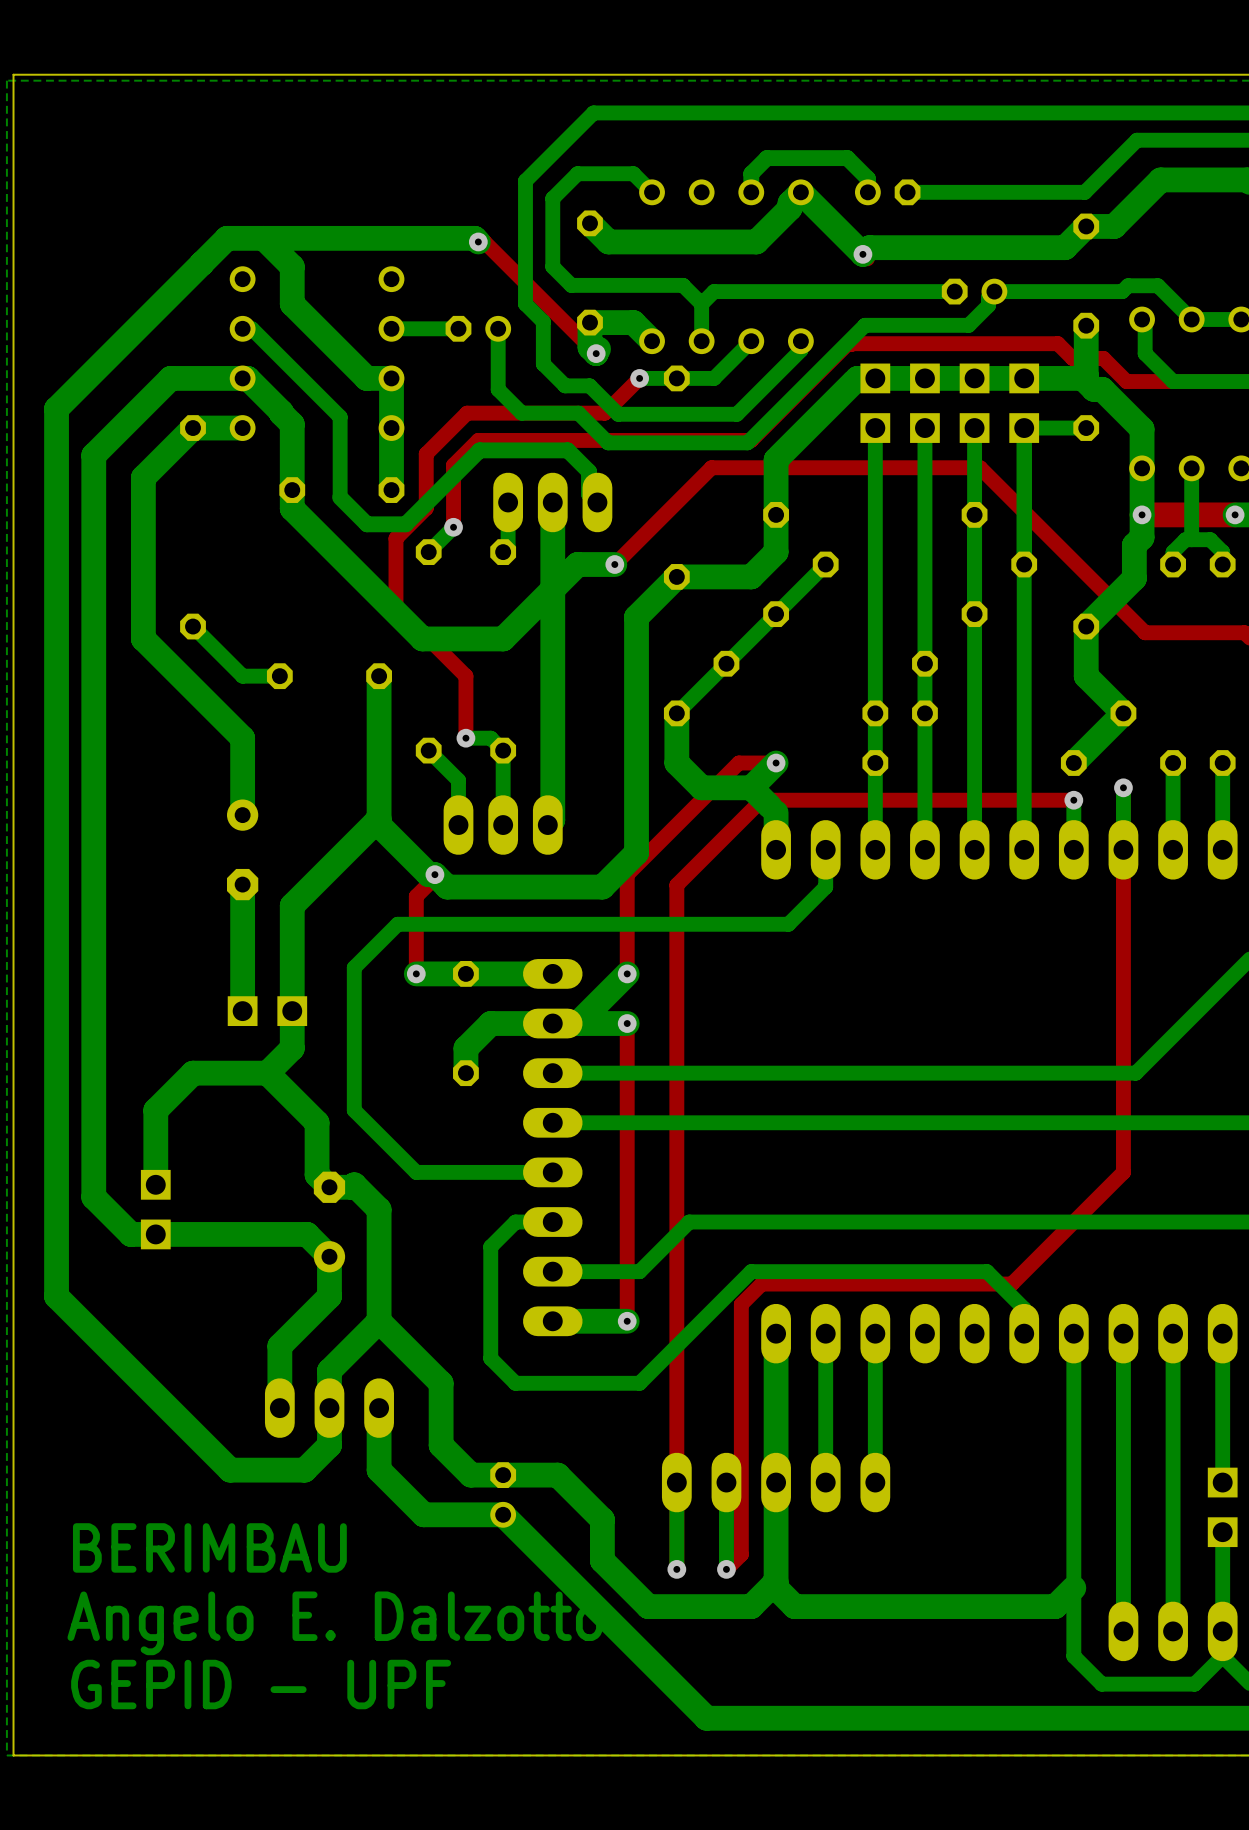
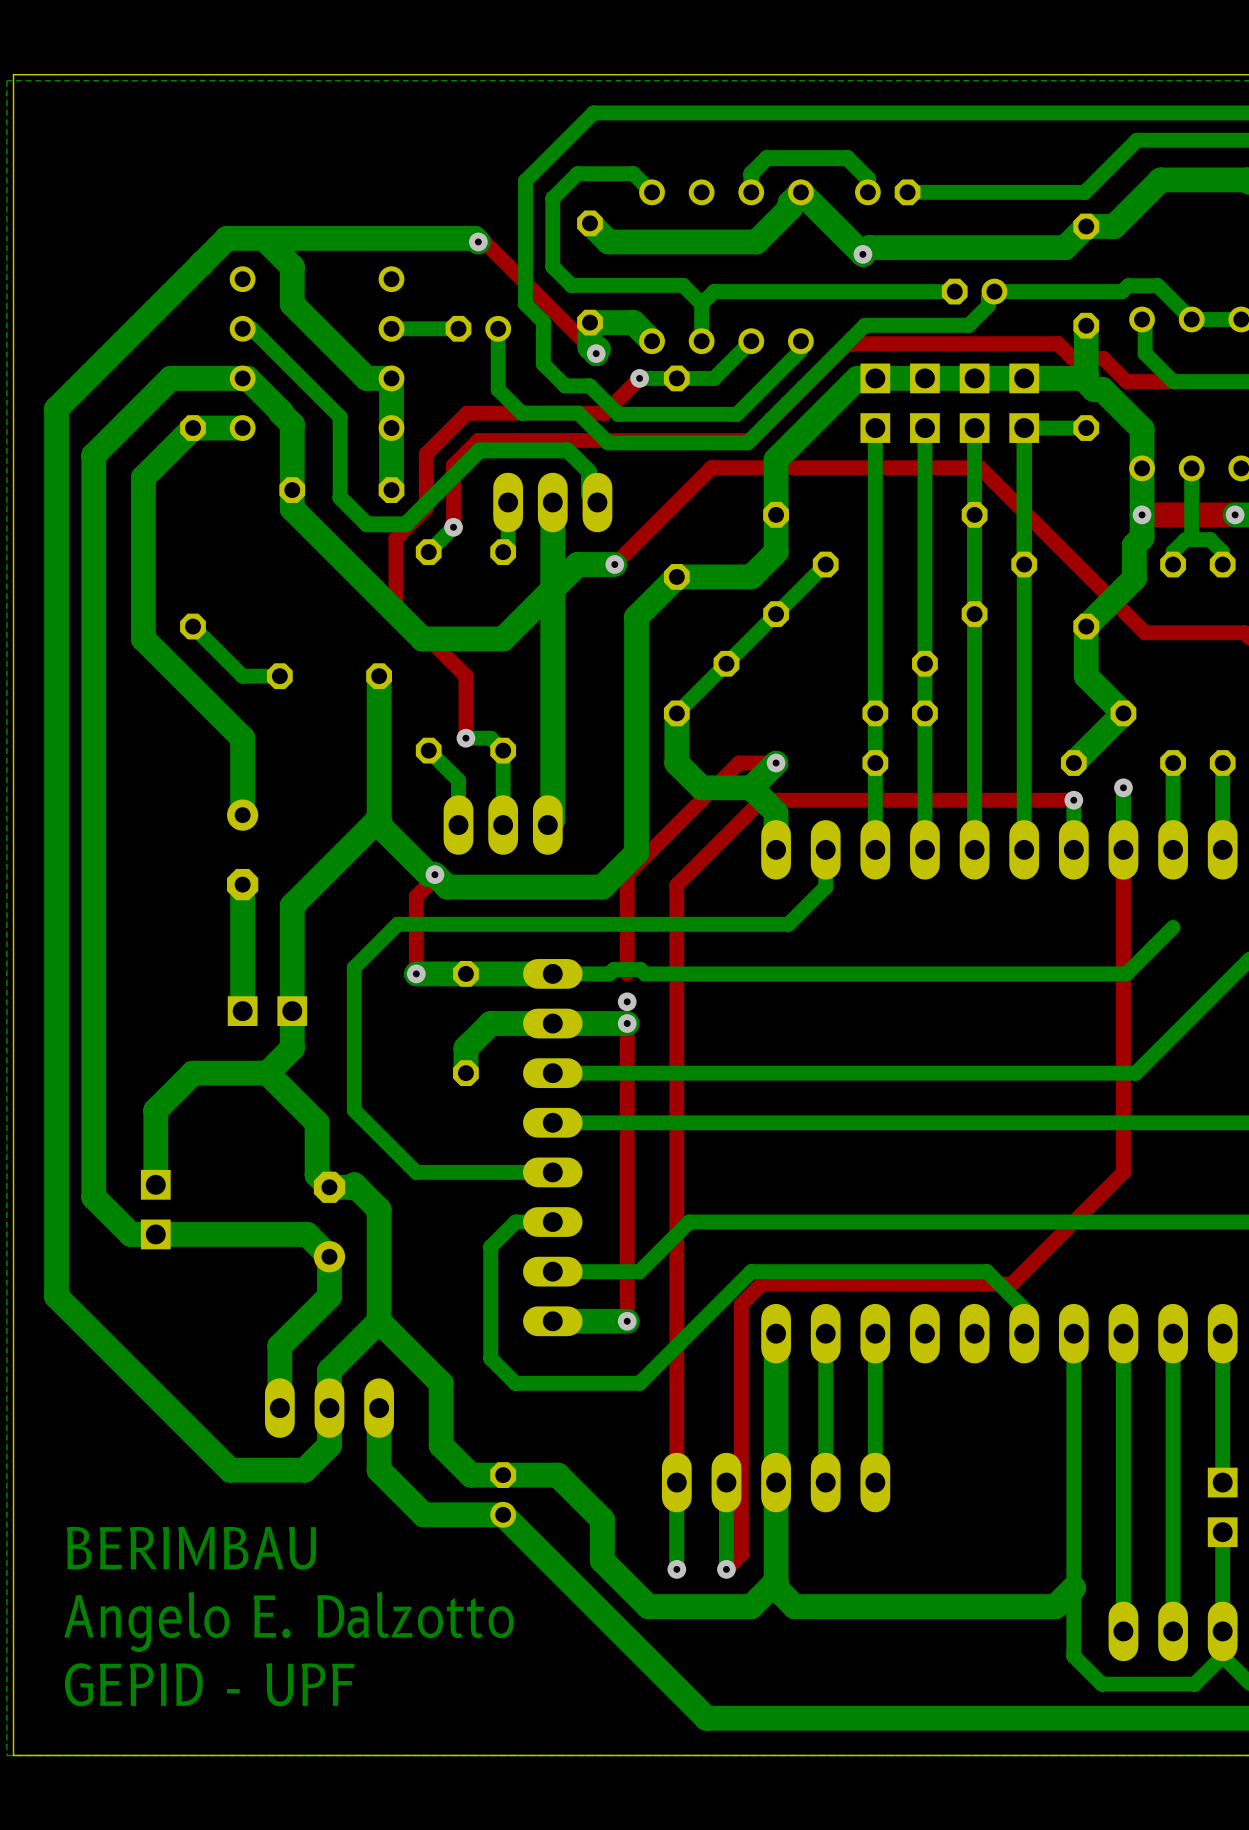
bottom track: none -> (1173, 927) (1126, 973) (644, 973) (640, 969) (613, 969) (609, 973) (552, 973)
bottom track: (627, 973) (577, 1023) -> none
via position: (627, 973) -> (627, 1001)

